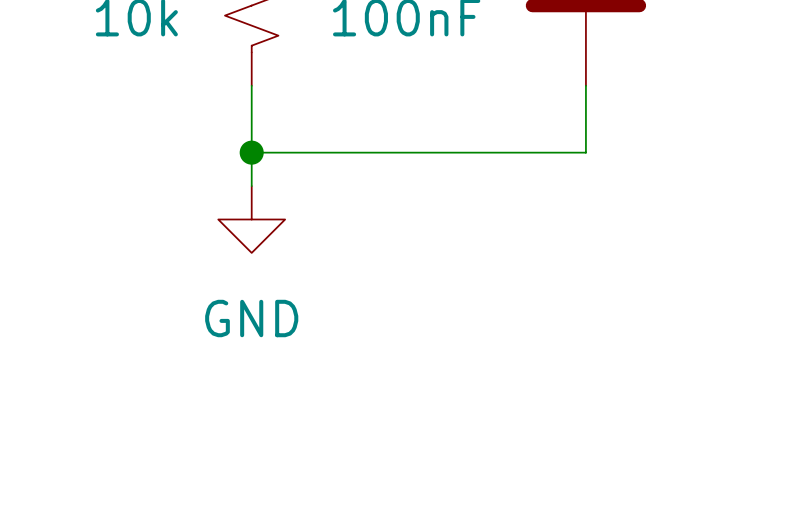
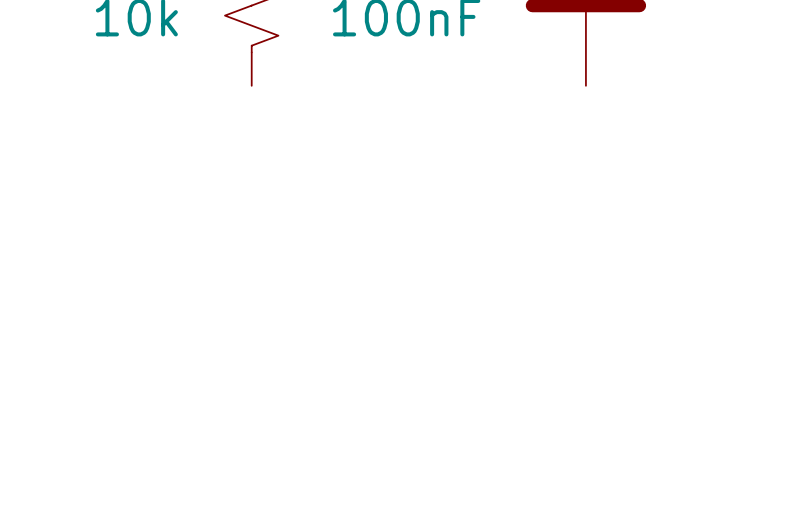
wire: (251, 85) (251, 186) -> none
wire: (585, 85) (585, 152) (251, 152) -> none
junction: (251, 152) -> none
power symbol: GND (251, 219) -> none

